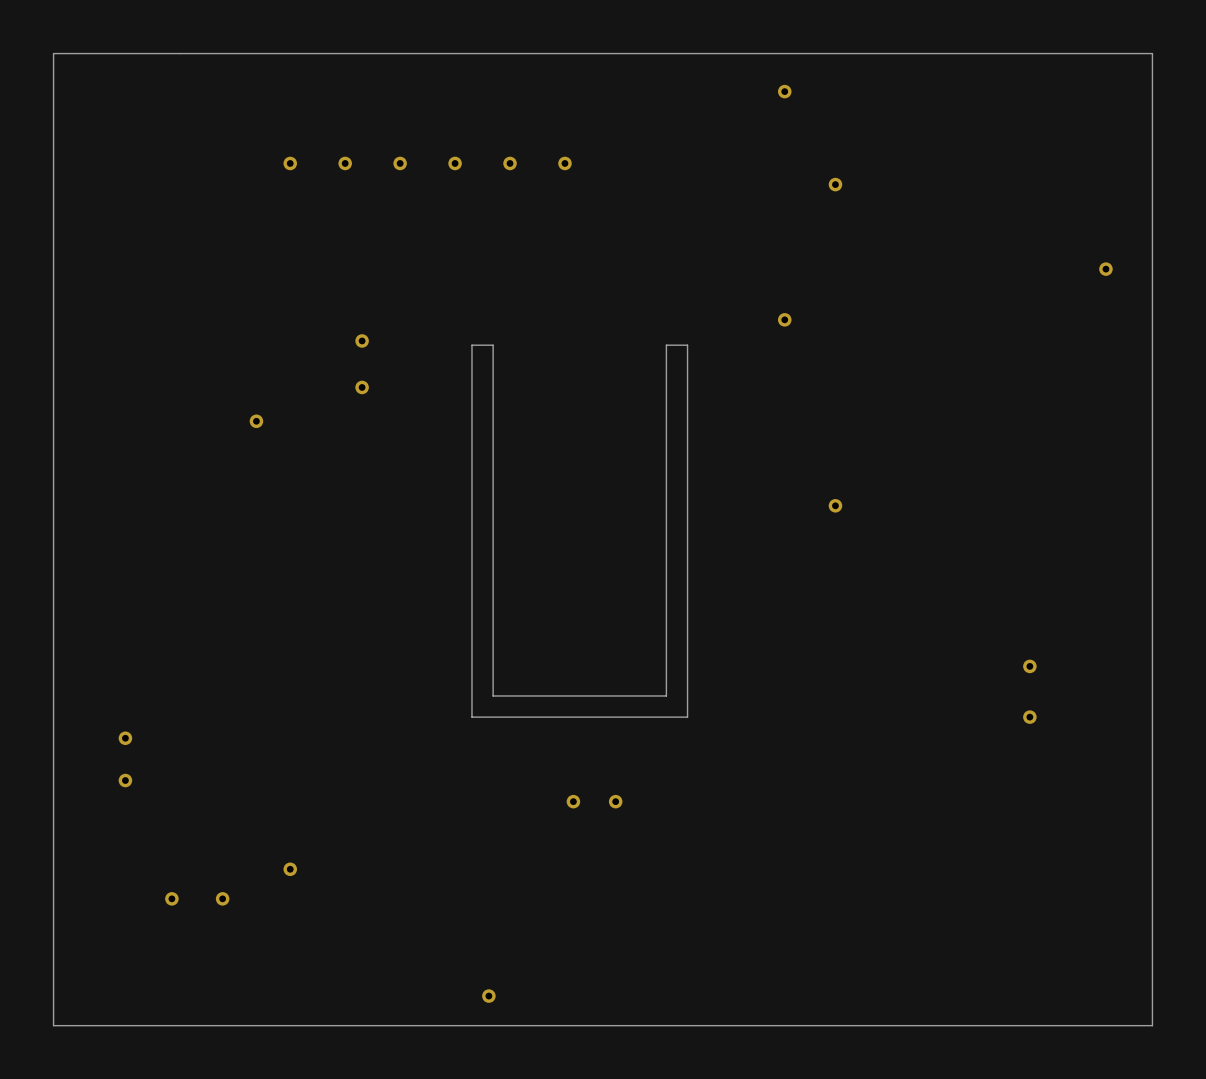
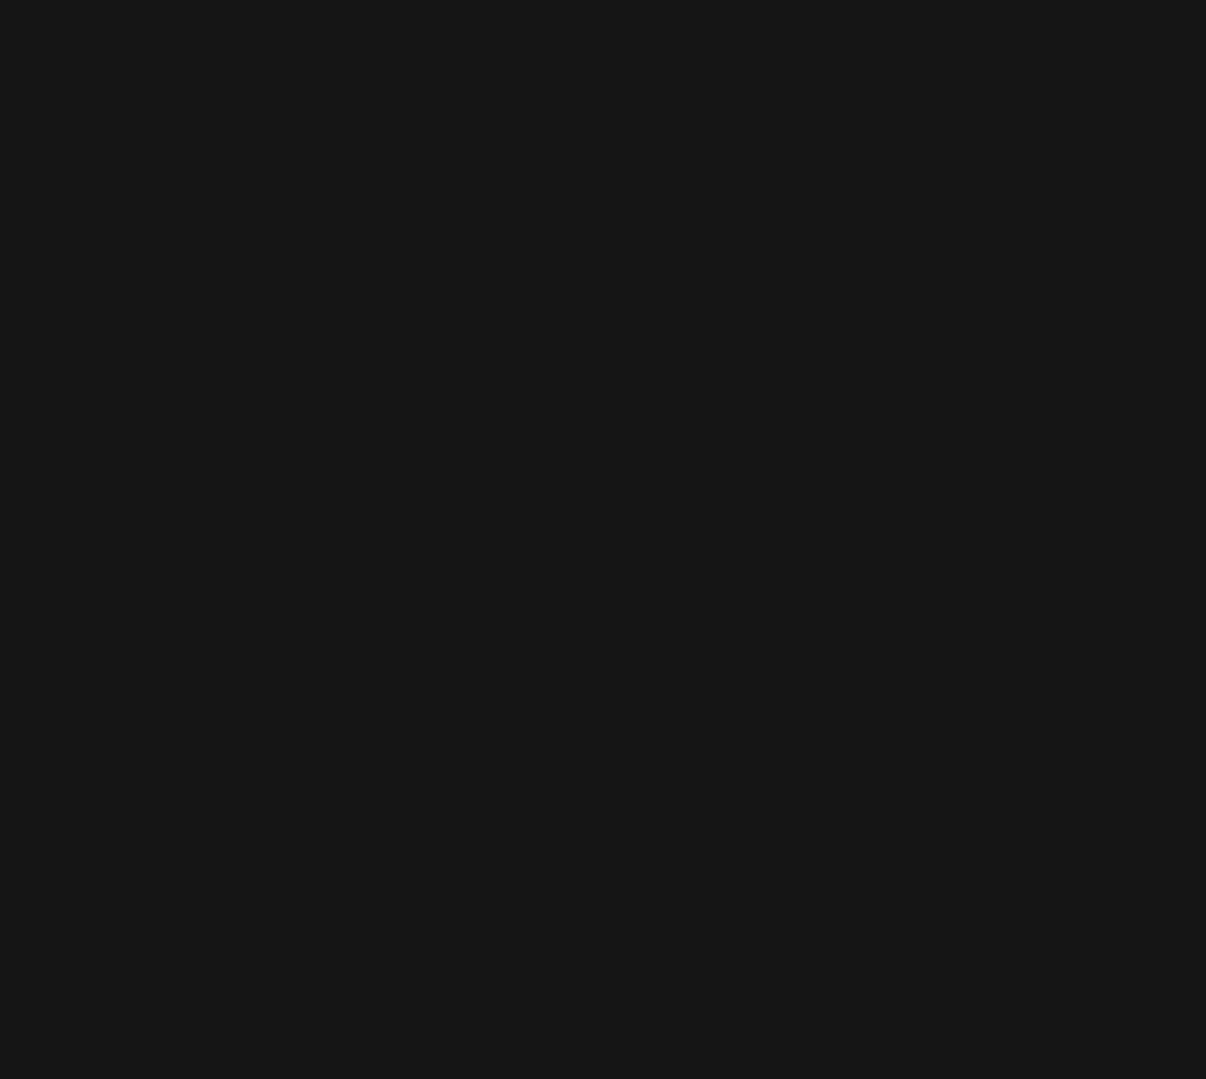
board edge: (1152, 53) (53, 53) (53, 1025) (1152, 1025) (1152, 53) -> none
via: (784, 91) -> none
via: (290, 163) -> none
via: (345, 163) -> none
via: (400, 163) -> none
via: (455, 163) -> none
via: (510, 163) -> none
via: (564, 163) -> none
via: (835, 184) -> none
via: (1105, 269) -> none
via: (784, 319) -> none
via: (362, 340) -> none
board edge: (687, 345) (666, 345) (666, 695) (493, 695) (493, 345) (471, 345) (471, 717) (687, 717) (687, 345) -> none
via: (362, 387) -> none
via: (256, 421) -> none
via: (835, 505) -> none
via: (1029, 666) -> none
via: (1029, 717) -> none
via: (125, 738) -> none
via: (125, 780) -> none
via: (573, 801) -> none
via: (615, 801) -> none
via: (290, 869) -> none
via: (171, 898) -> none
via: (222, 898) -> none
via: (488, 996) -> none

